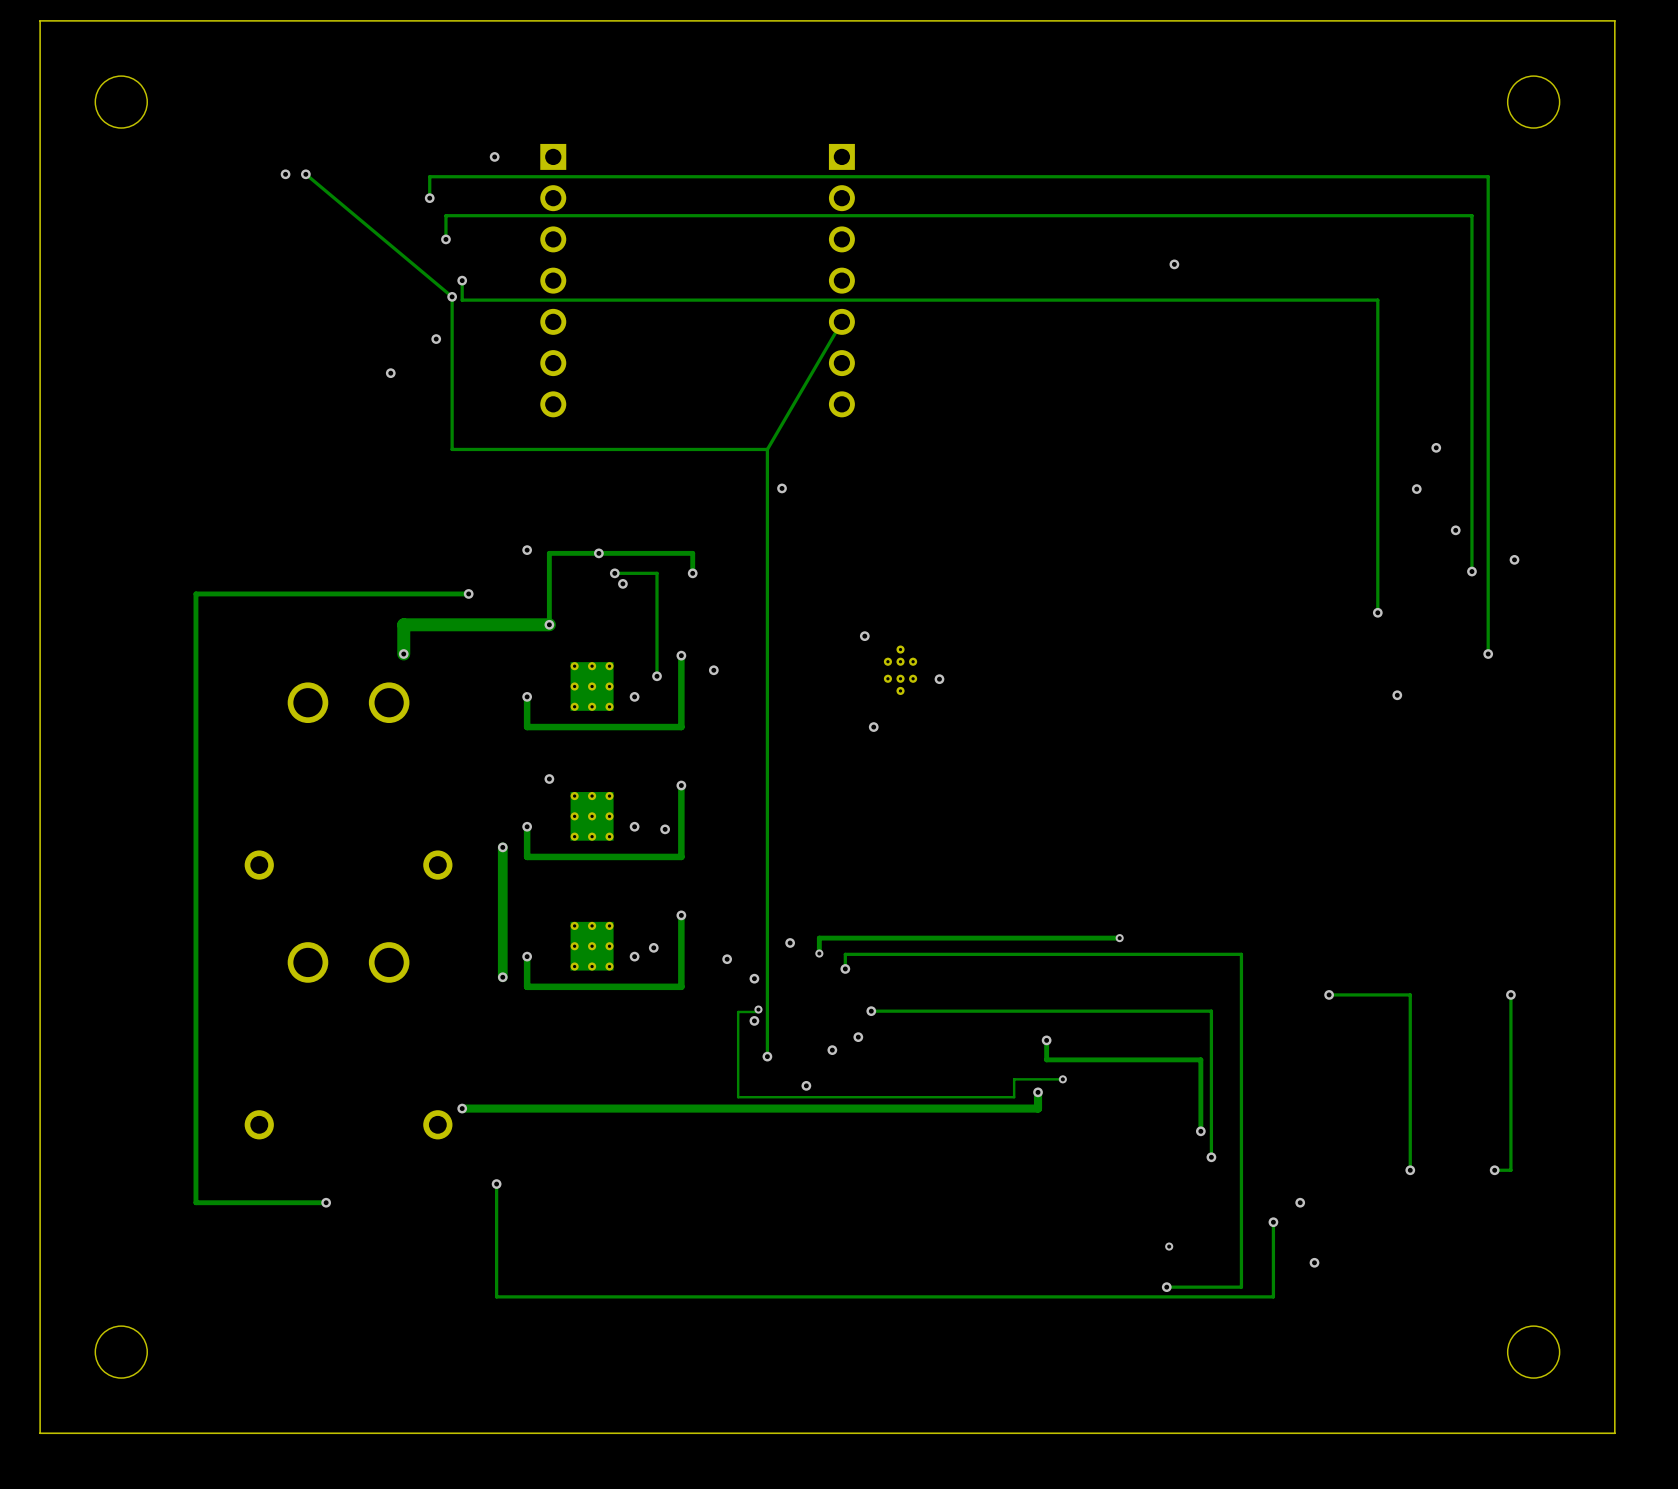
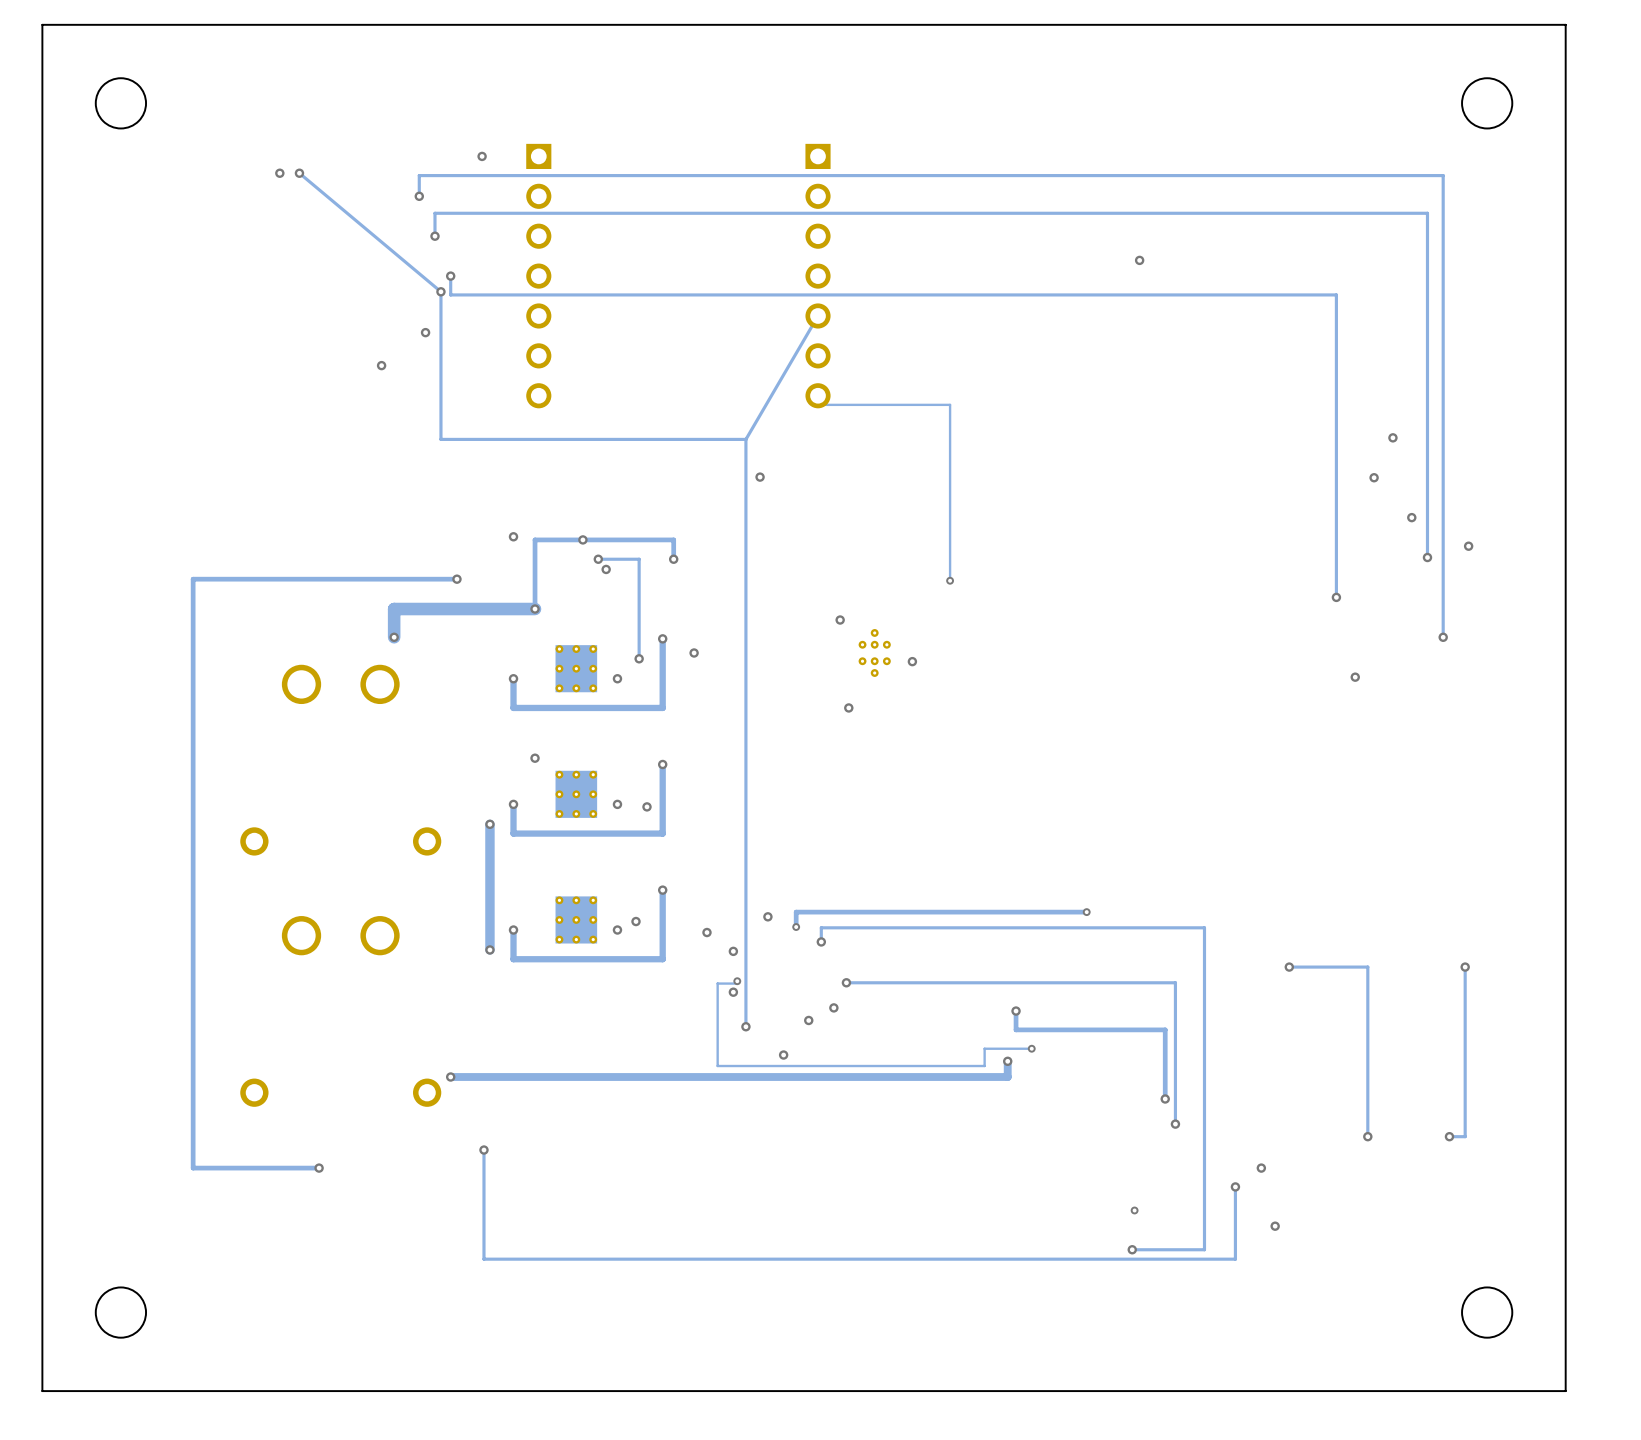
track: none -> (818, 395) (818, 404) (950, 404) (950, 580)
via: none -> (950, 580)

